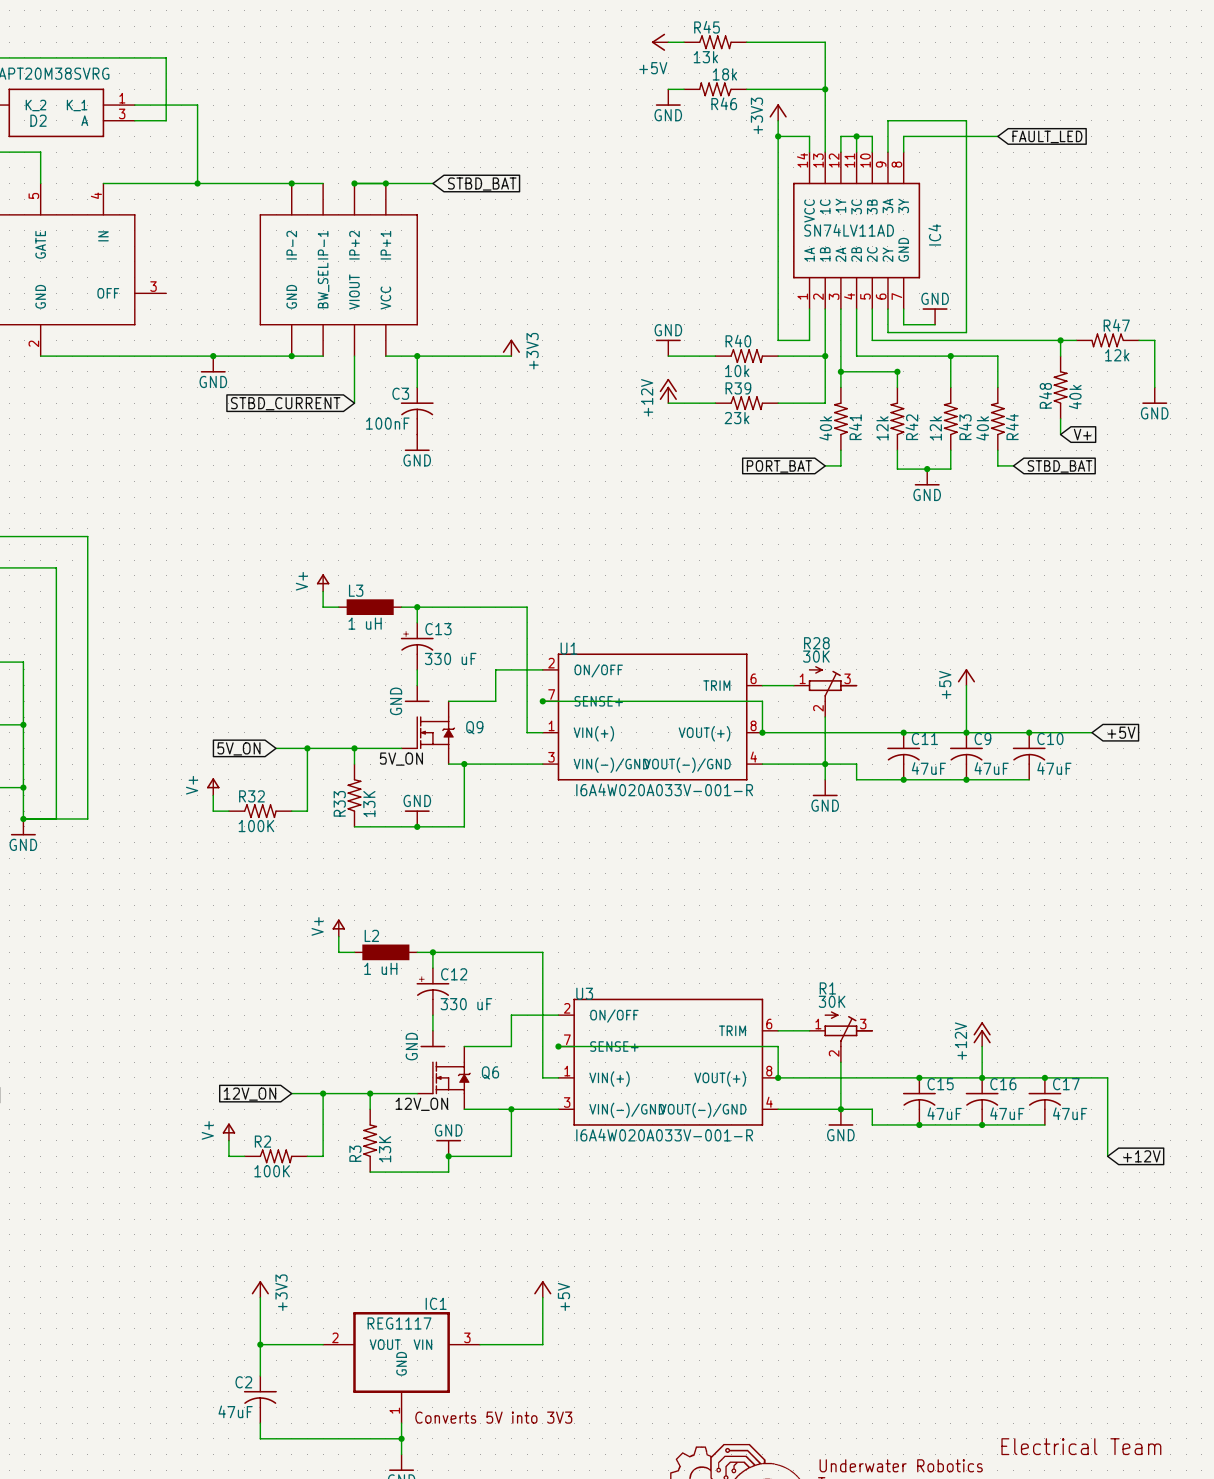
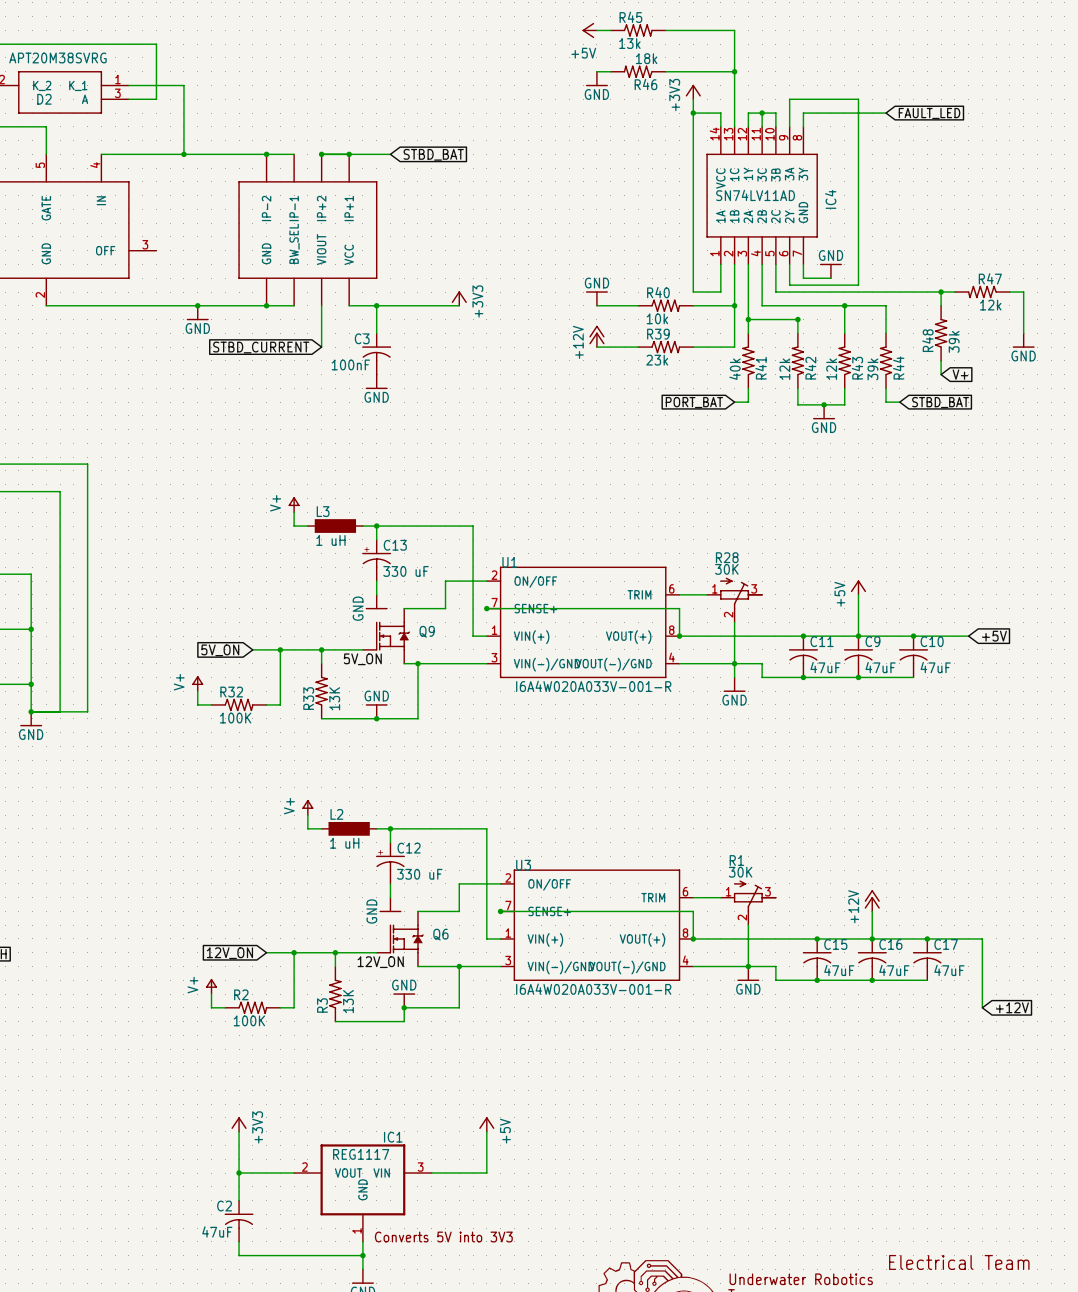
R48 value: 40k (1075, 397) -> 39k (954, 341)
R44 value: 40k (982, 428) -> 39k (872, 369)

